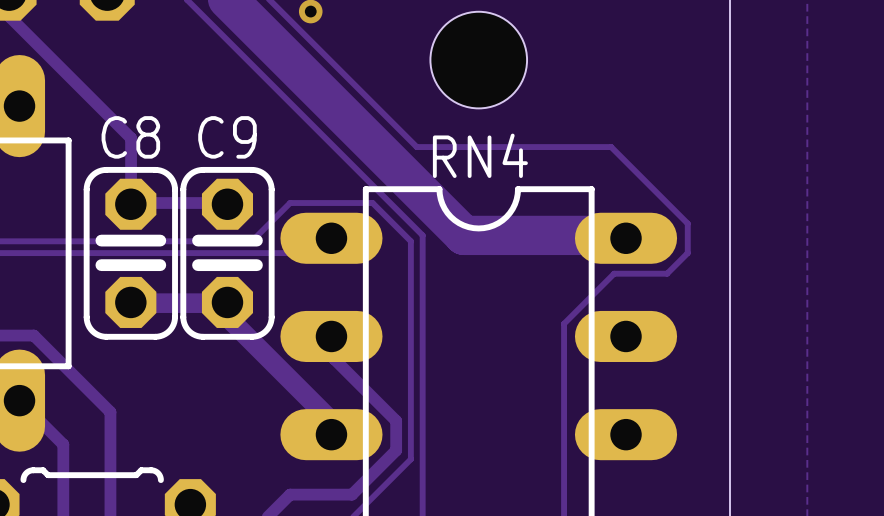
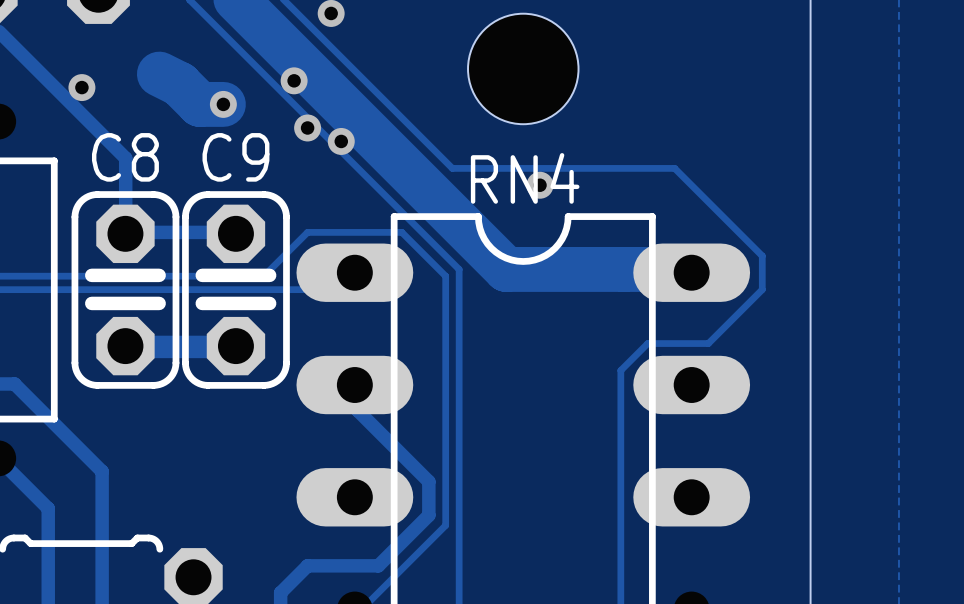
track: none -> (159, 74) (179, 84) (199, 104) (223, 104)
via: none -> (294, 80)
via: none -> (81, 87)
via: none -> (223, 104)
via: none -> (307, 127)
via: none -> (341, 141)
via: none -> (539, 185)
track: (667, 273) (614, 273) (587, 300) -> (738, 313) (708, 343) (647, 343)
track: (227, 302) (222, 312) (331, 420) (331, 434) -> none

